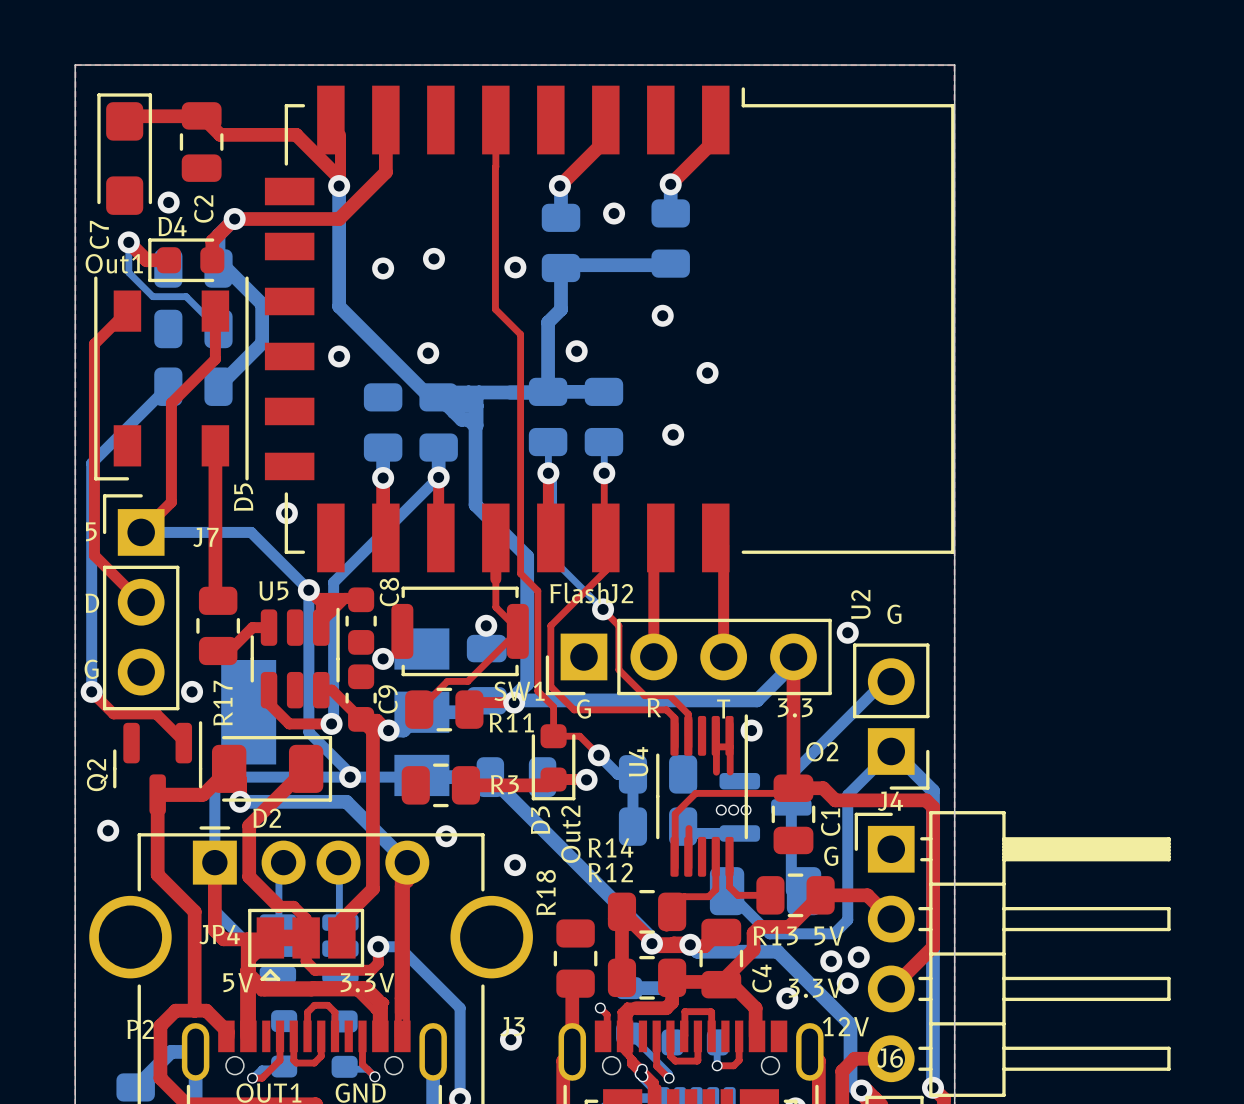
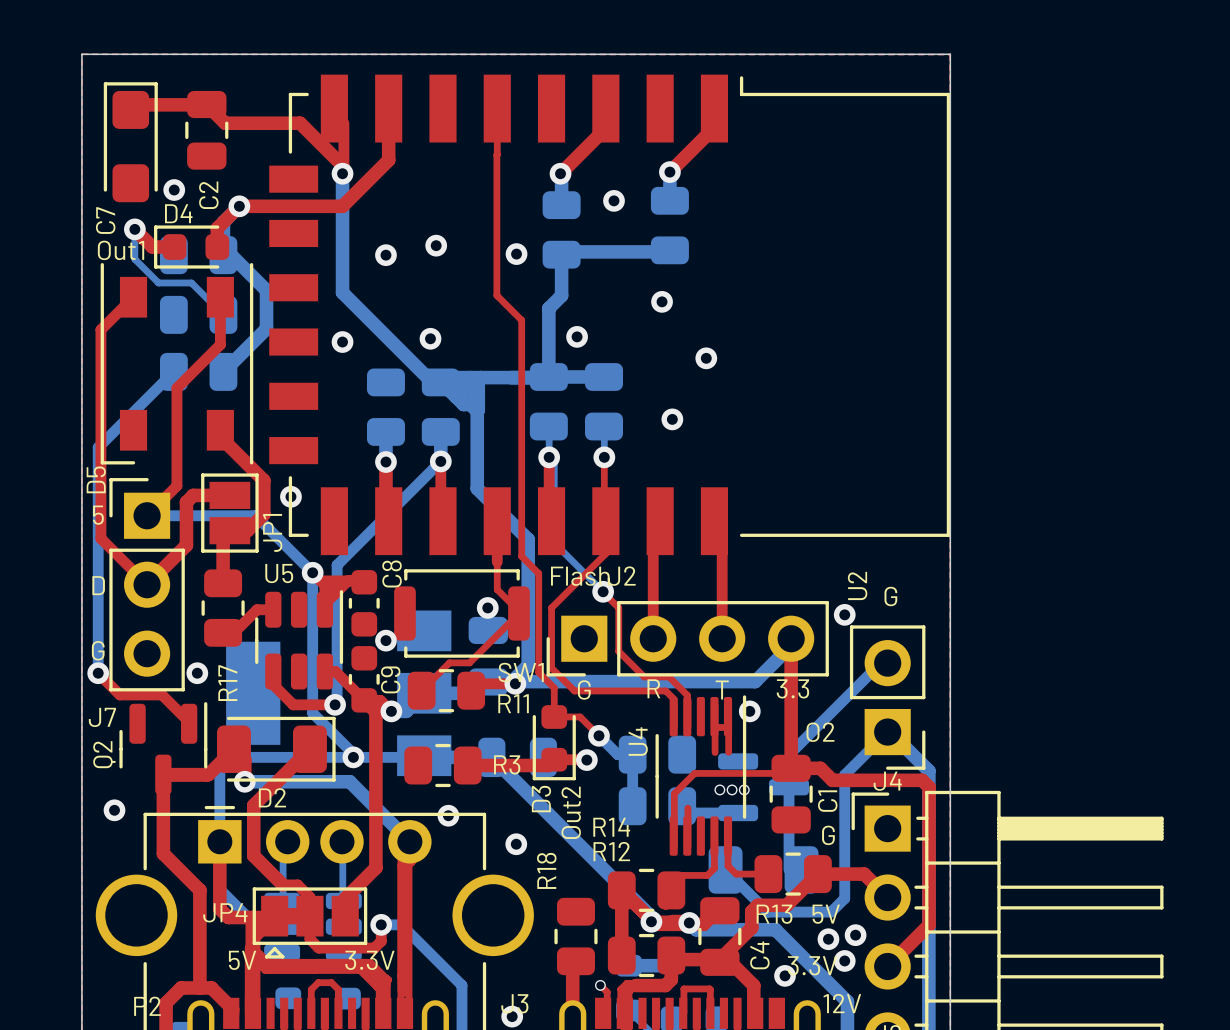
top track: (215, 452) (215, 598) -> (220, 437) (263, 480) (263, 514) (247, 530) (223, 530) (223, 583)
D5 name position: D5 (243, 497) -> D5 (96, 479)
top track: none -> (223, 495) (193, 495) (186, 502) (186, 545) (147, 584)
JP1: none -> (229, 513)
J7 name position: J7 (205, 537) -> J7 (102, 717)

